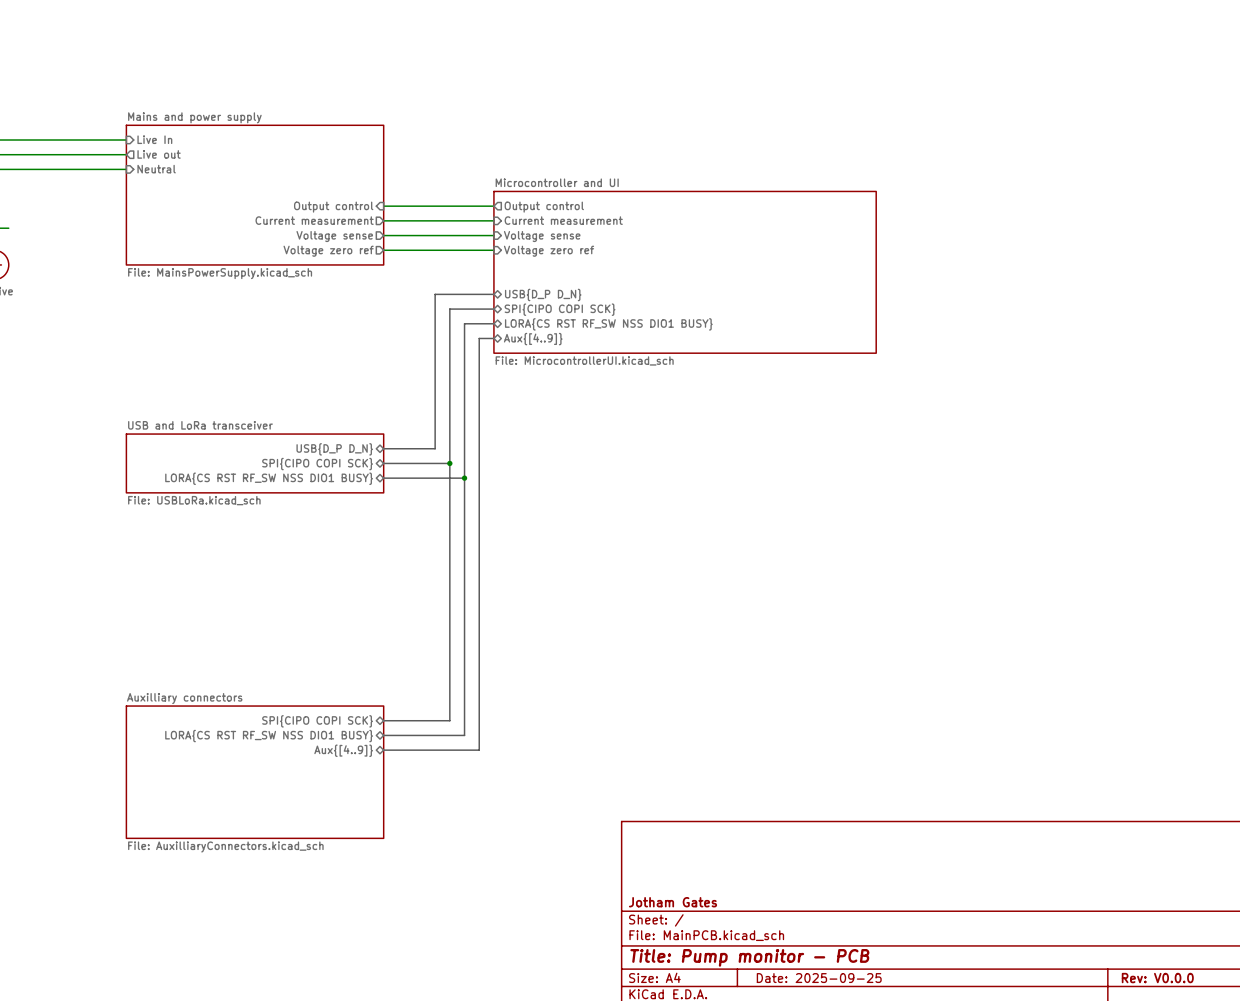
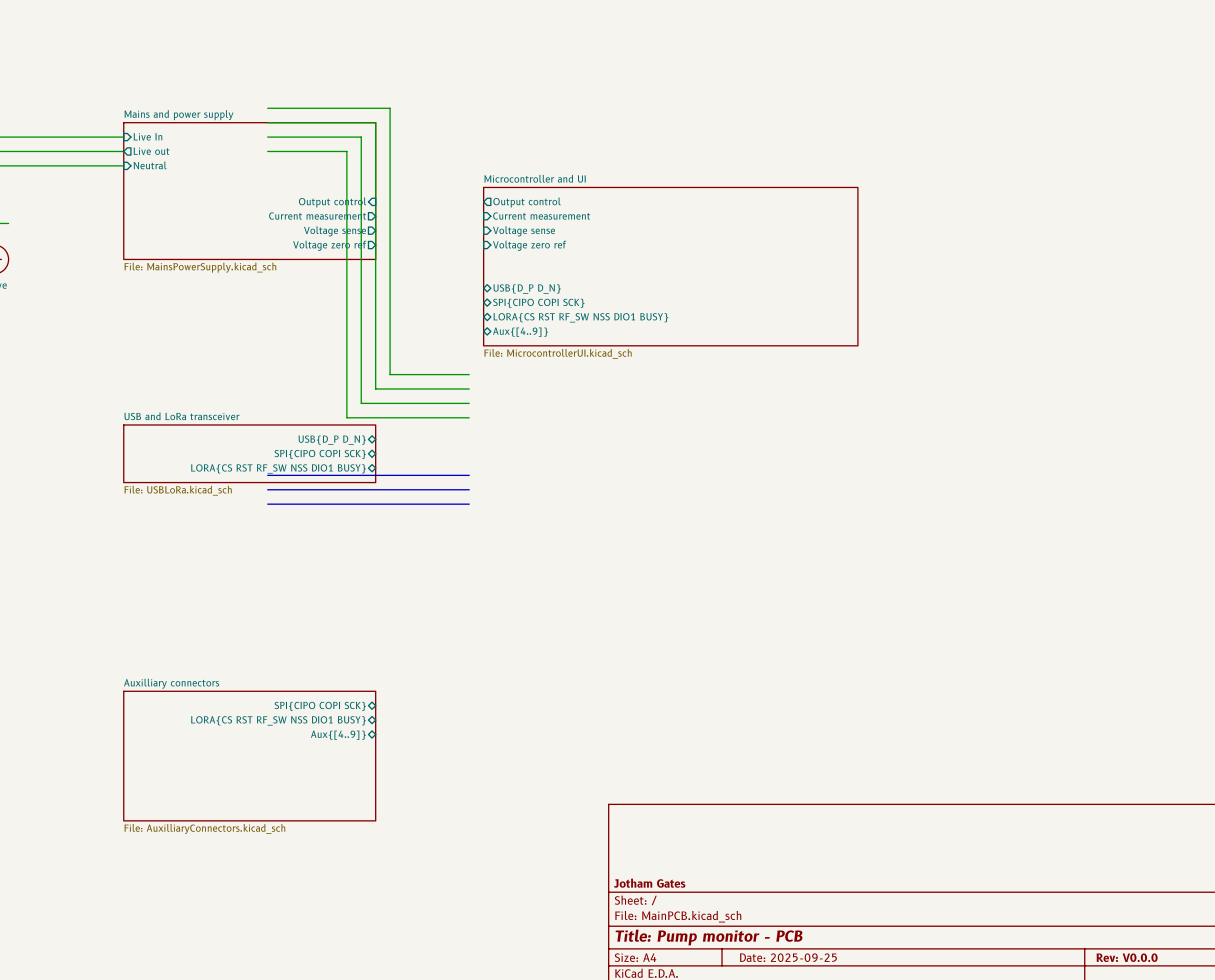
wire: none -> (267, 108) (390, 108) (390, 374) (469, 374)
wire: none -> (267, 122) (375, 122) (375, 389) (469, 389)
wire: none -> (267, 137) (361, 137) (361, 403) (469, 403)
wire: none -> (267, 151) (346, 151) (346, 417) (469, 417)
wire: (383, 206) (493, 206) -> none
wire: (383, 220) (493, 220) -> none
wire: (383, 235) (493, 235) -> none
wire: (383, 250) (493, 250) -> none
bus: (493, 294) (435, 294) (435, 448) (383, 448) -> none
bus: (493, 309) (449, 309) (449, 720) (383, 720) -> none
bus: (493, 323) (464, 323) (464, 735) (383, 735) -> none
bus: (493, 338) (479, 338) (479, 750) (383, 750) -> none
bus: (383, 463) (449, 463) -> none
junction: (449, 463) -> none
bus: (383, 478) (464, 478) -> none
junction: (464, 478) -> none
bus: none -> (267, 475) (469, 475)
bus: none -> (267, 489) (469, 489)
bus: none -> (267, 504) (469, 504)

